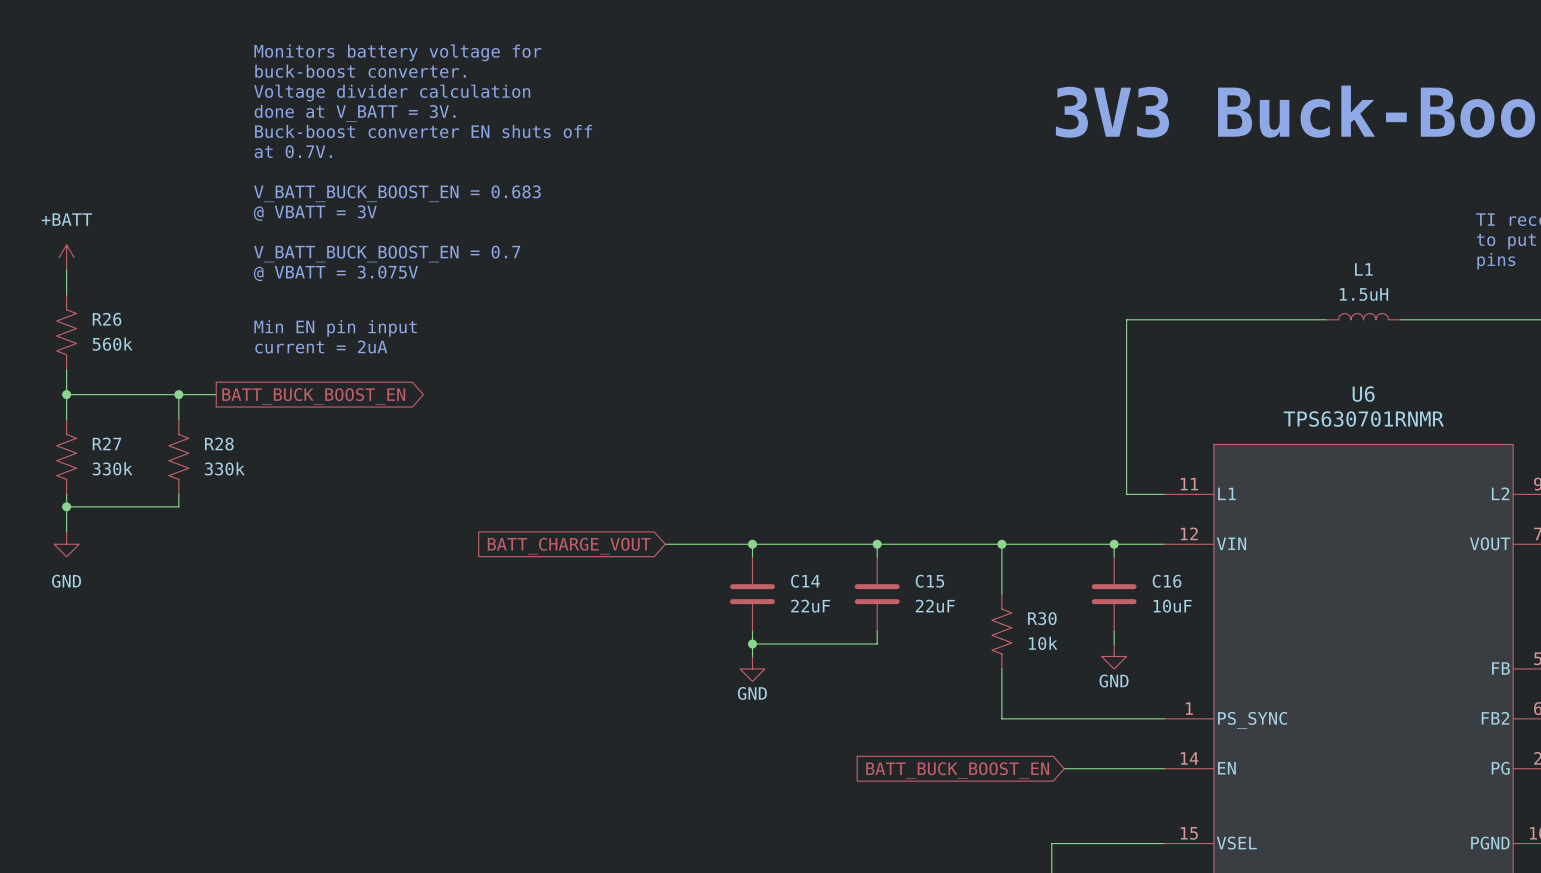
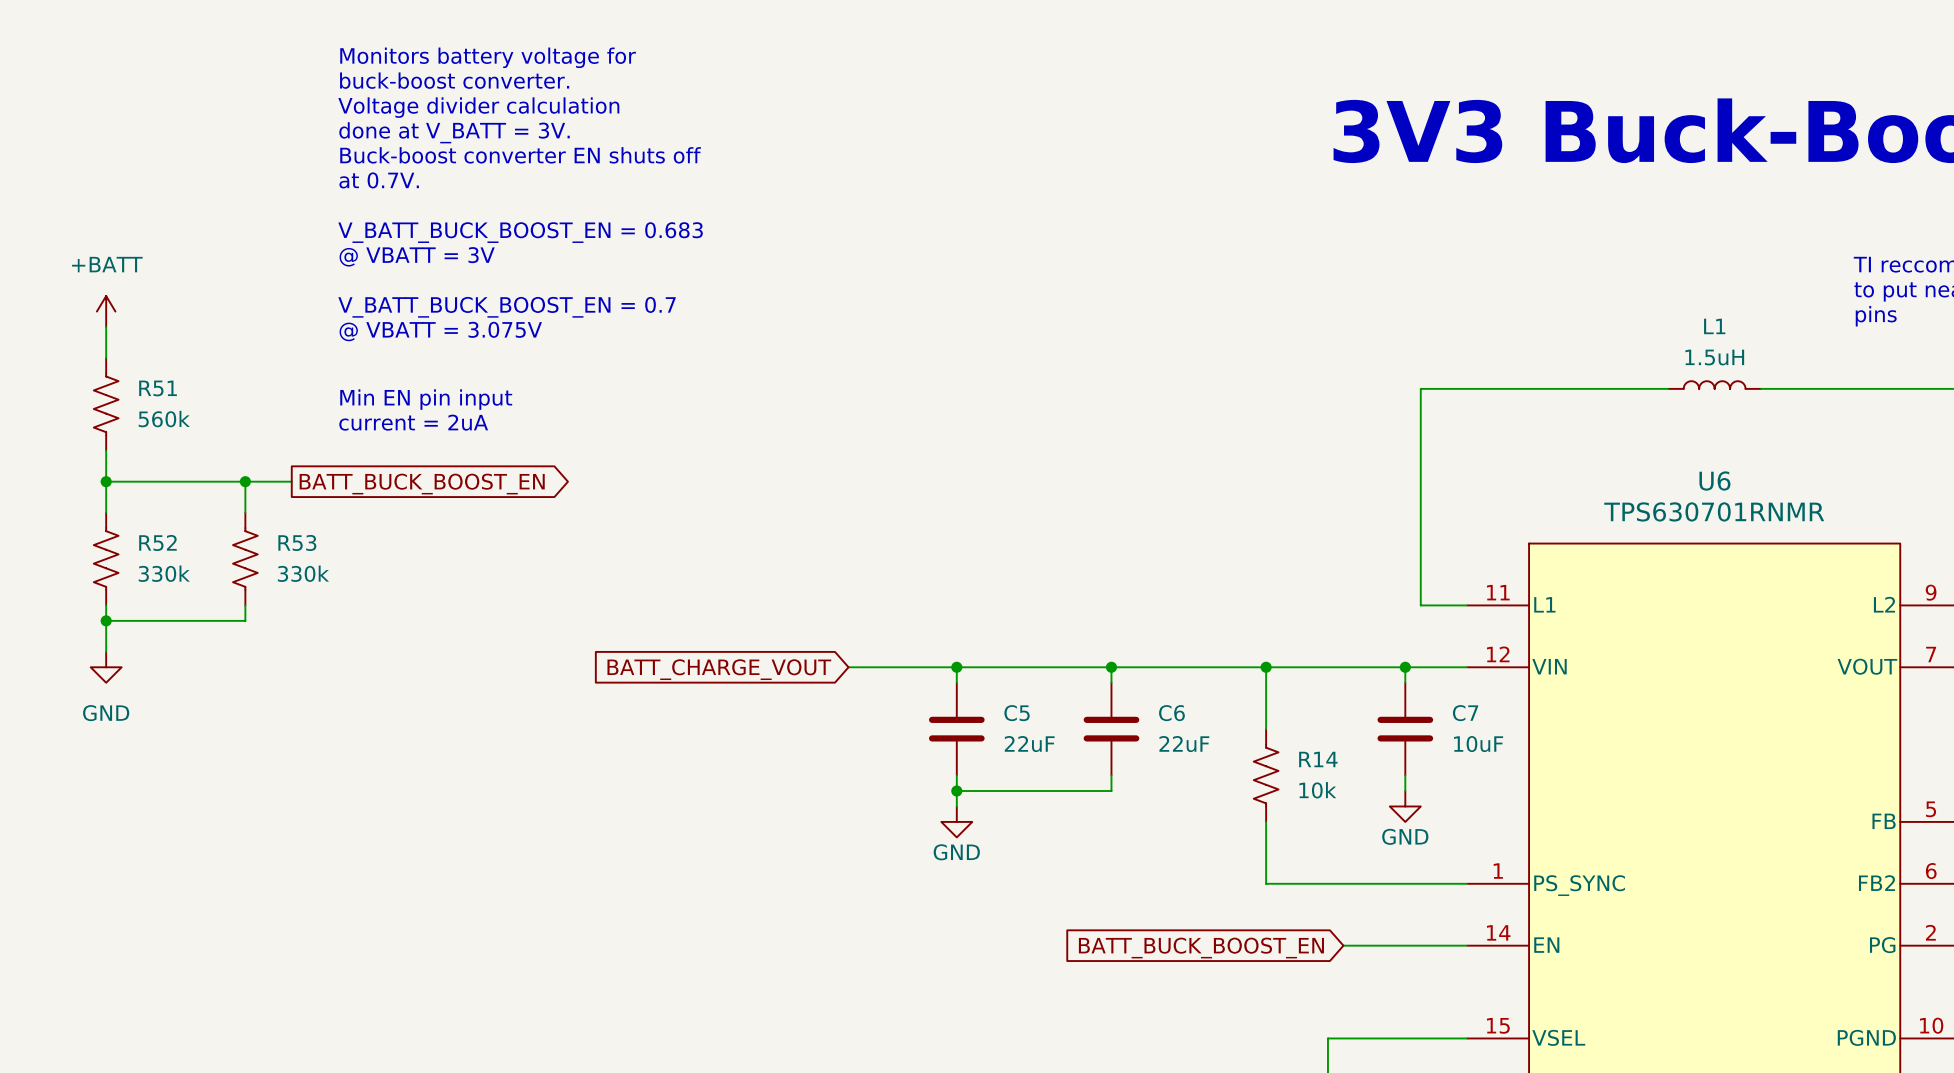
R26 name: R26 (107, 319) -> R51 (158, 388)
R27 name: R27 (106, 443) -> R52 (157, 542)
R28 name: R28 (219, 444) -> R53 (297, 542)
C14 name: C14 (805, 581) -> C5 (1017, 713)
C15 name: C15 (929, 581) -> C6 (1171, 713)
C16 name: C16 (1167, 581) -> C7 (1465, 713)
R30 name: R30 (1042, 618) -> R14 (1318, 759)

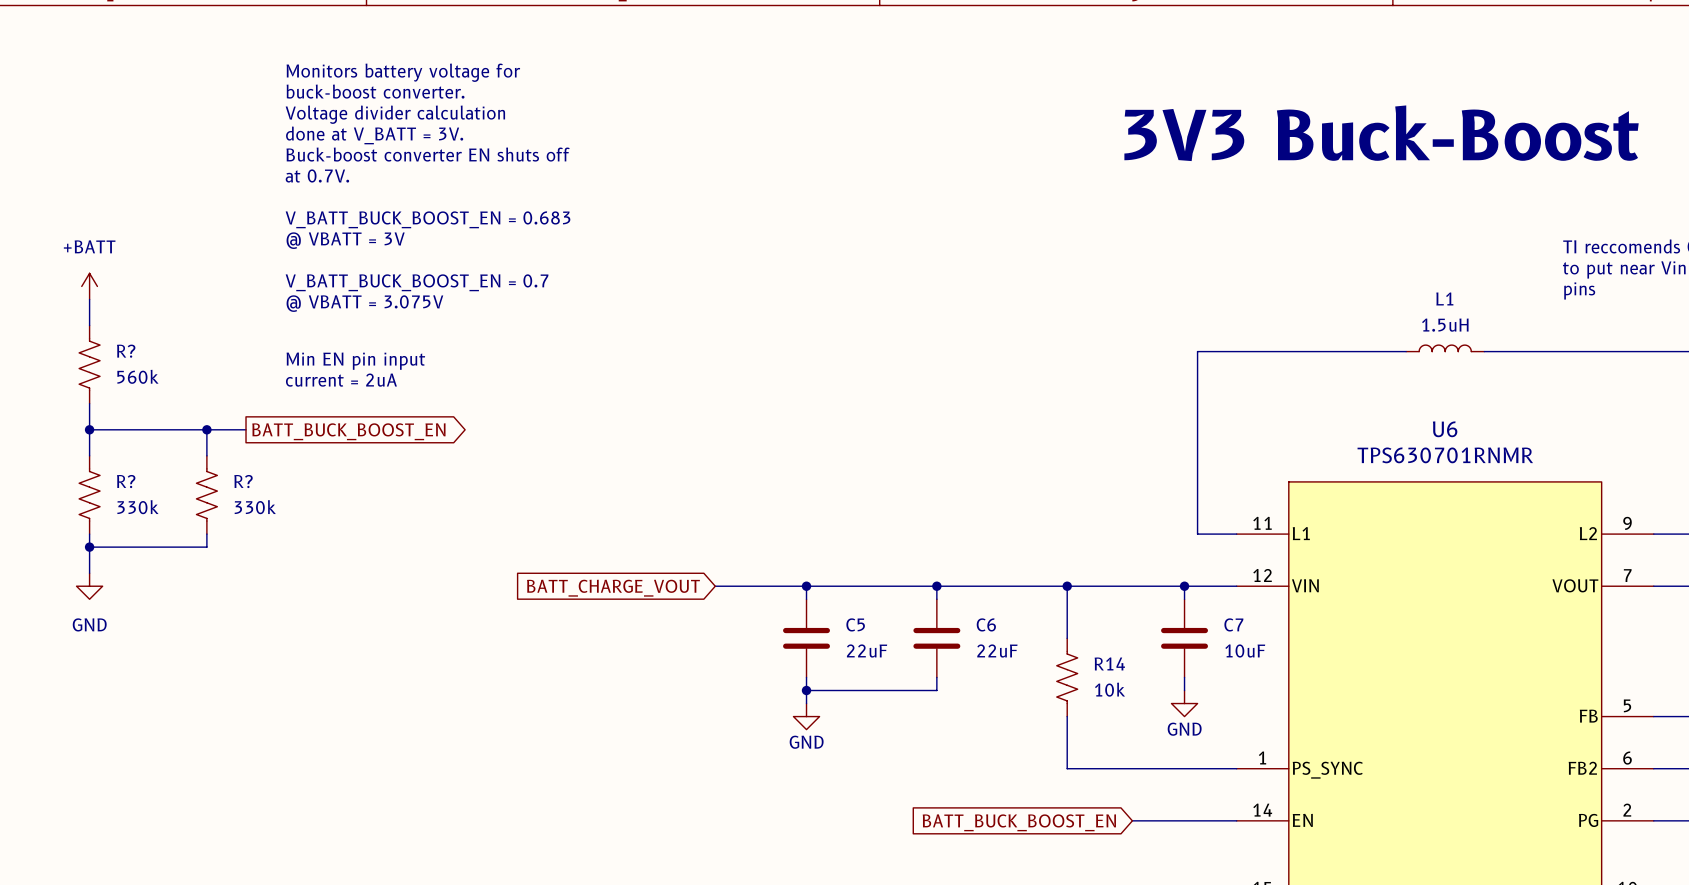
R51 name: R51 (158, 388) -> R? (126, 351)
R52 name: R52 (157, 542) -> R? (126, 481)
R53 name: R53 (297, 542) -> R? (243, 481)

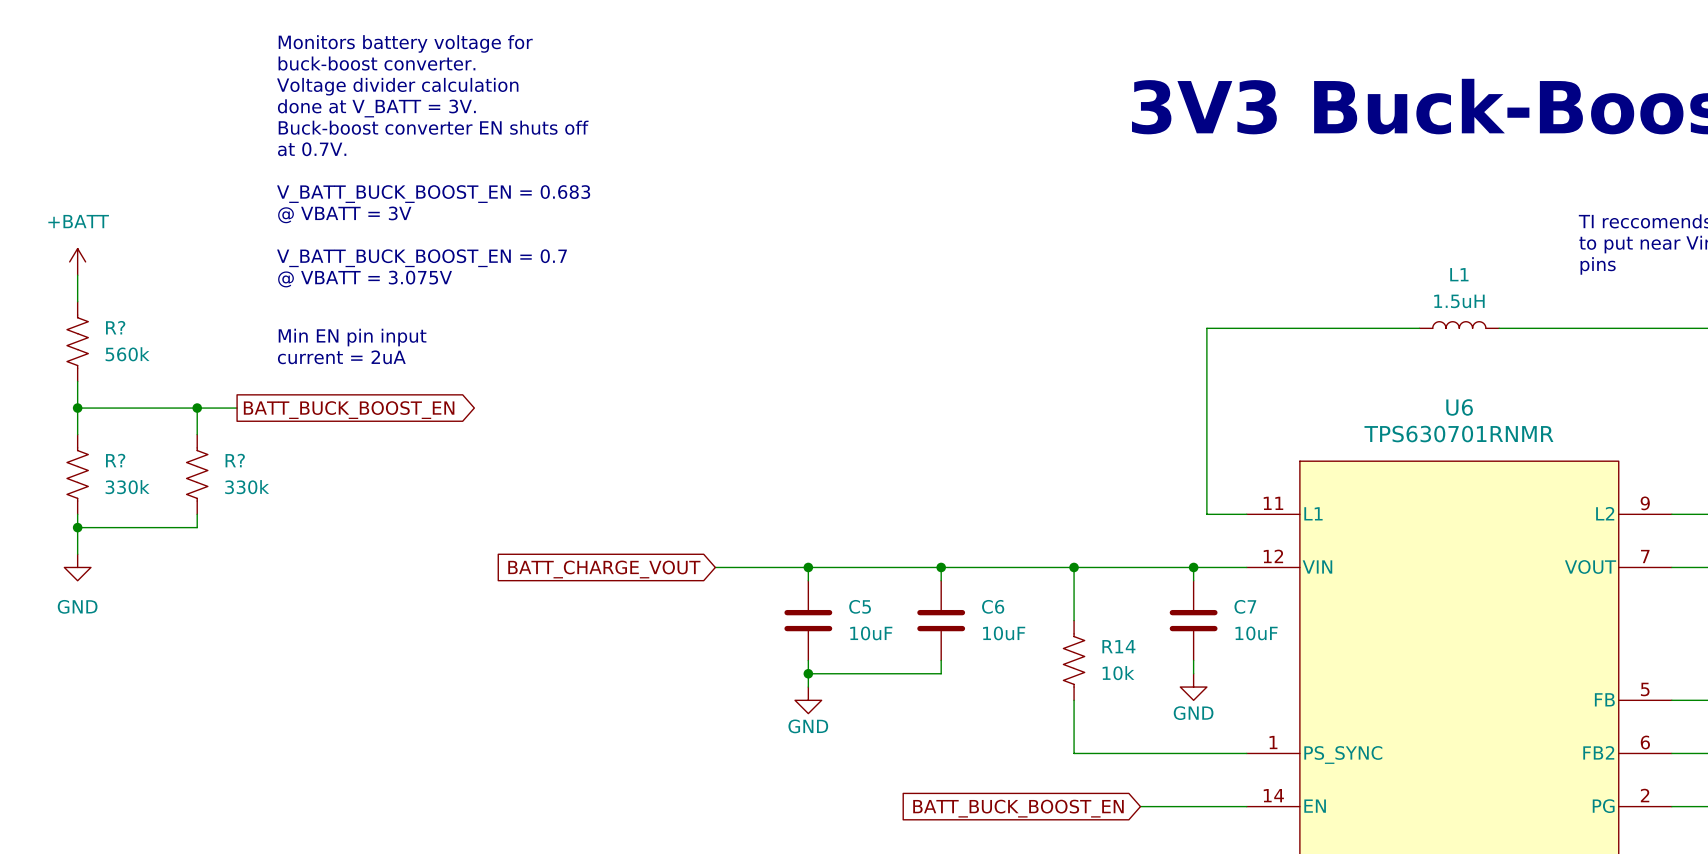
C5 value: 22uF (867, 651) -> 10uF (871, 633)
C6 value: 22uF (997, 651) -> 10uF (1004, 633)

